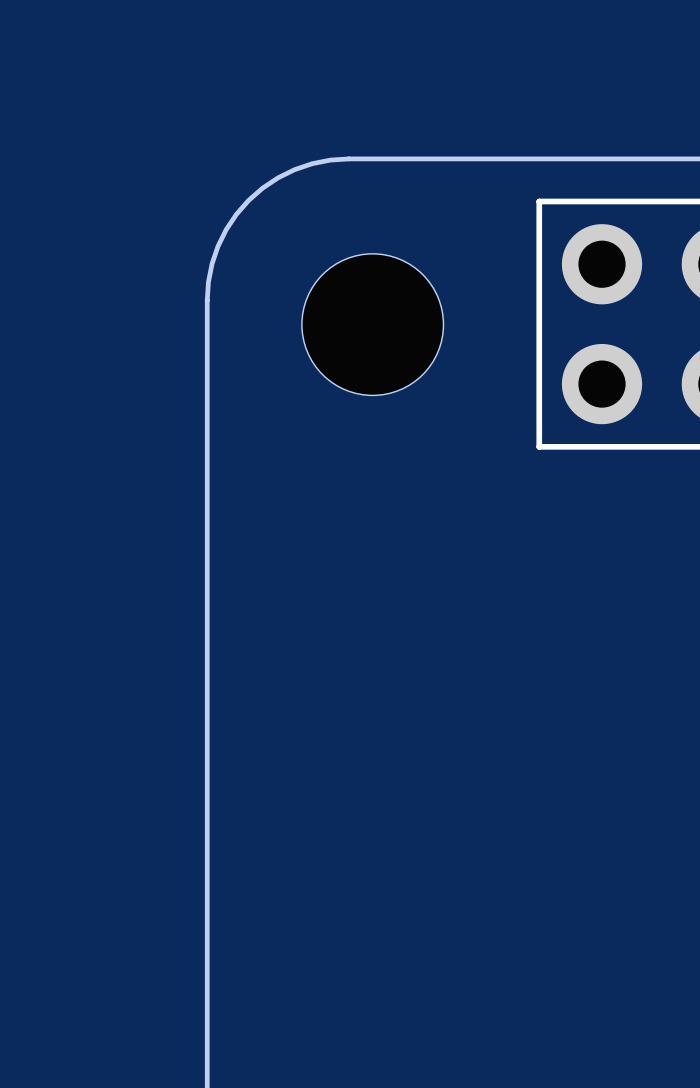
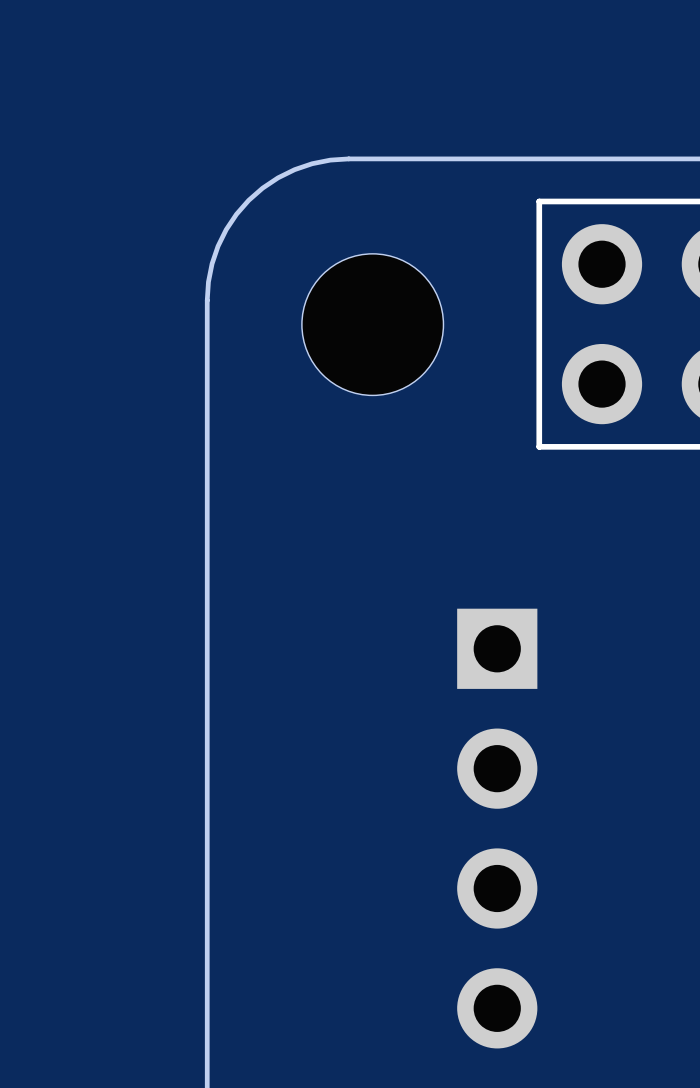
part: none -> (497, 828)

